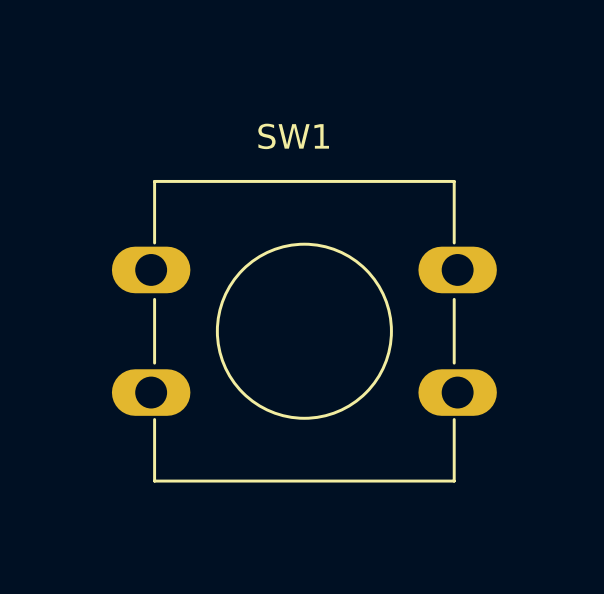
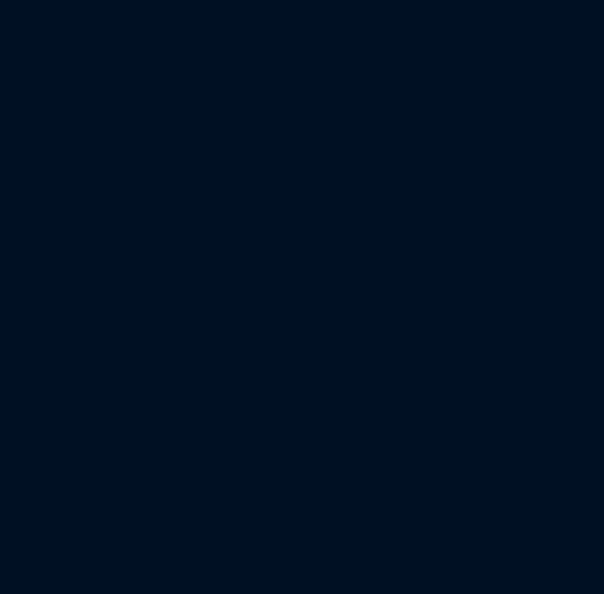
SW1: (304, 331) -> none

